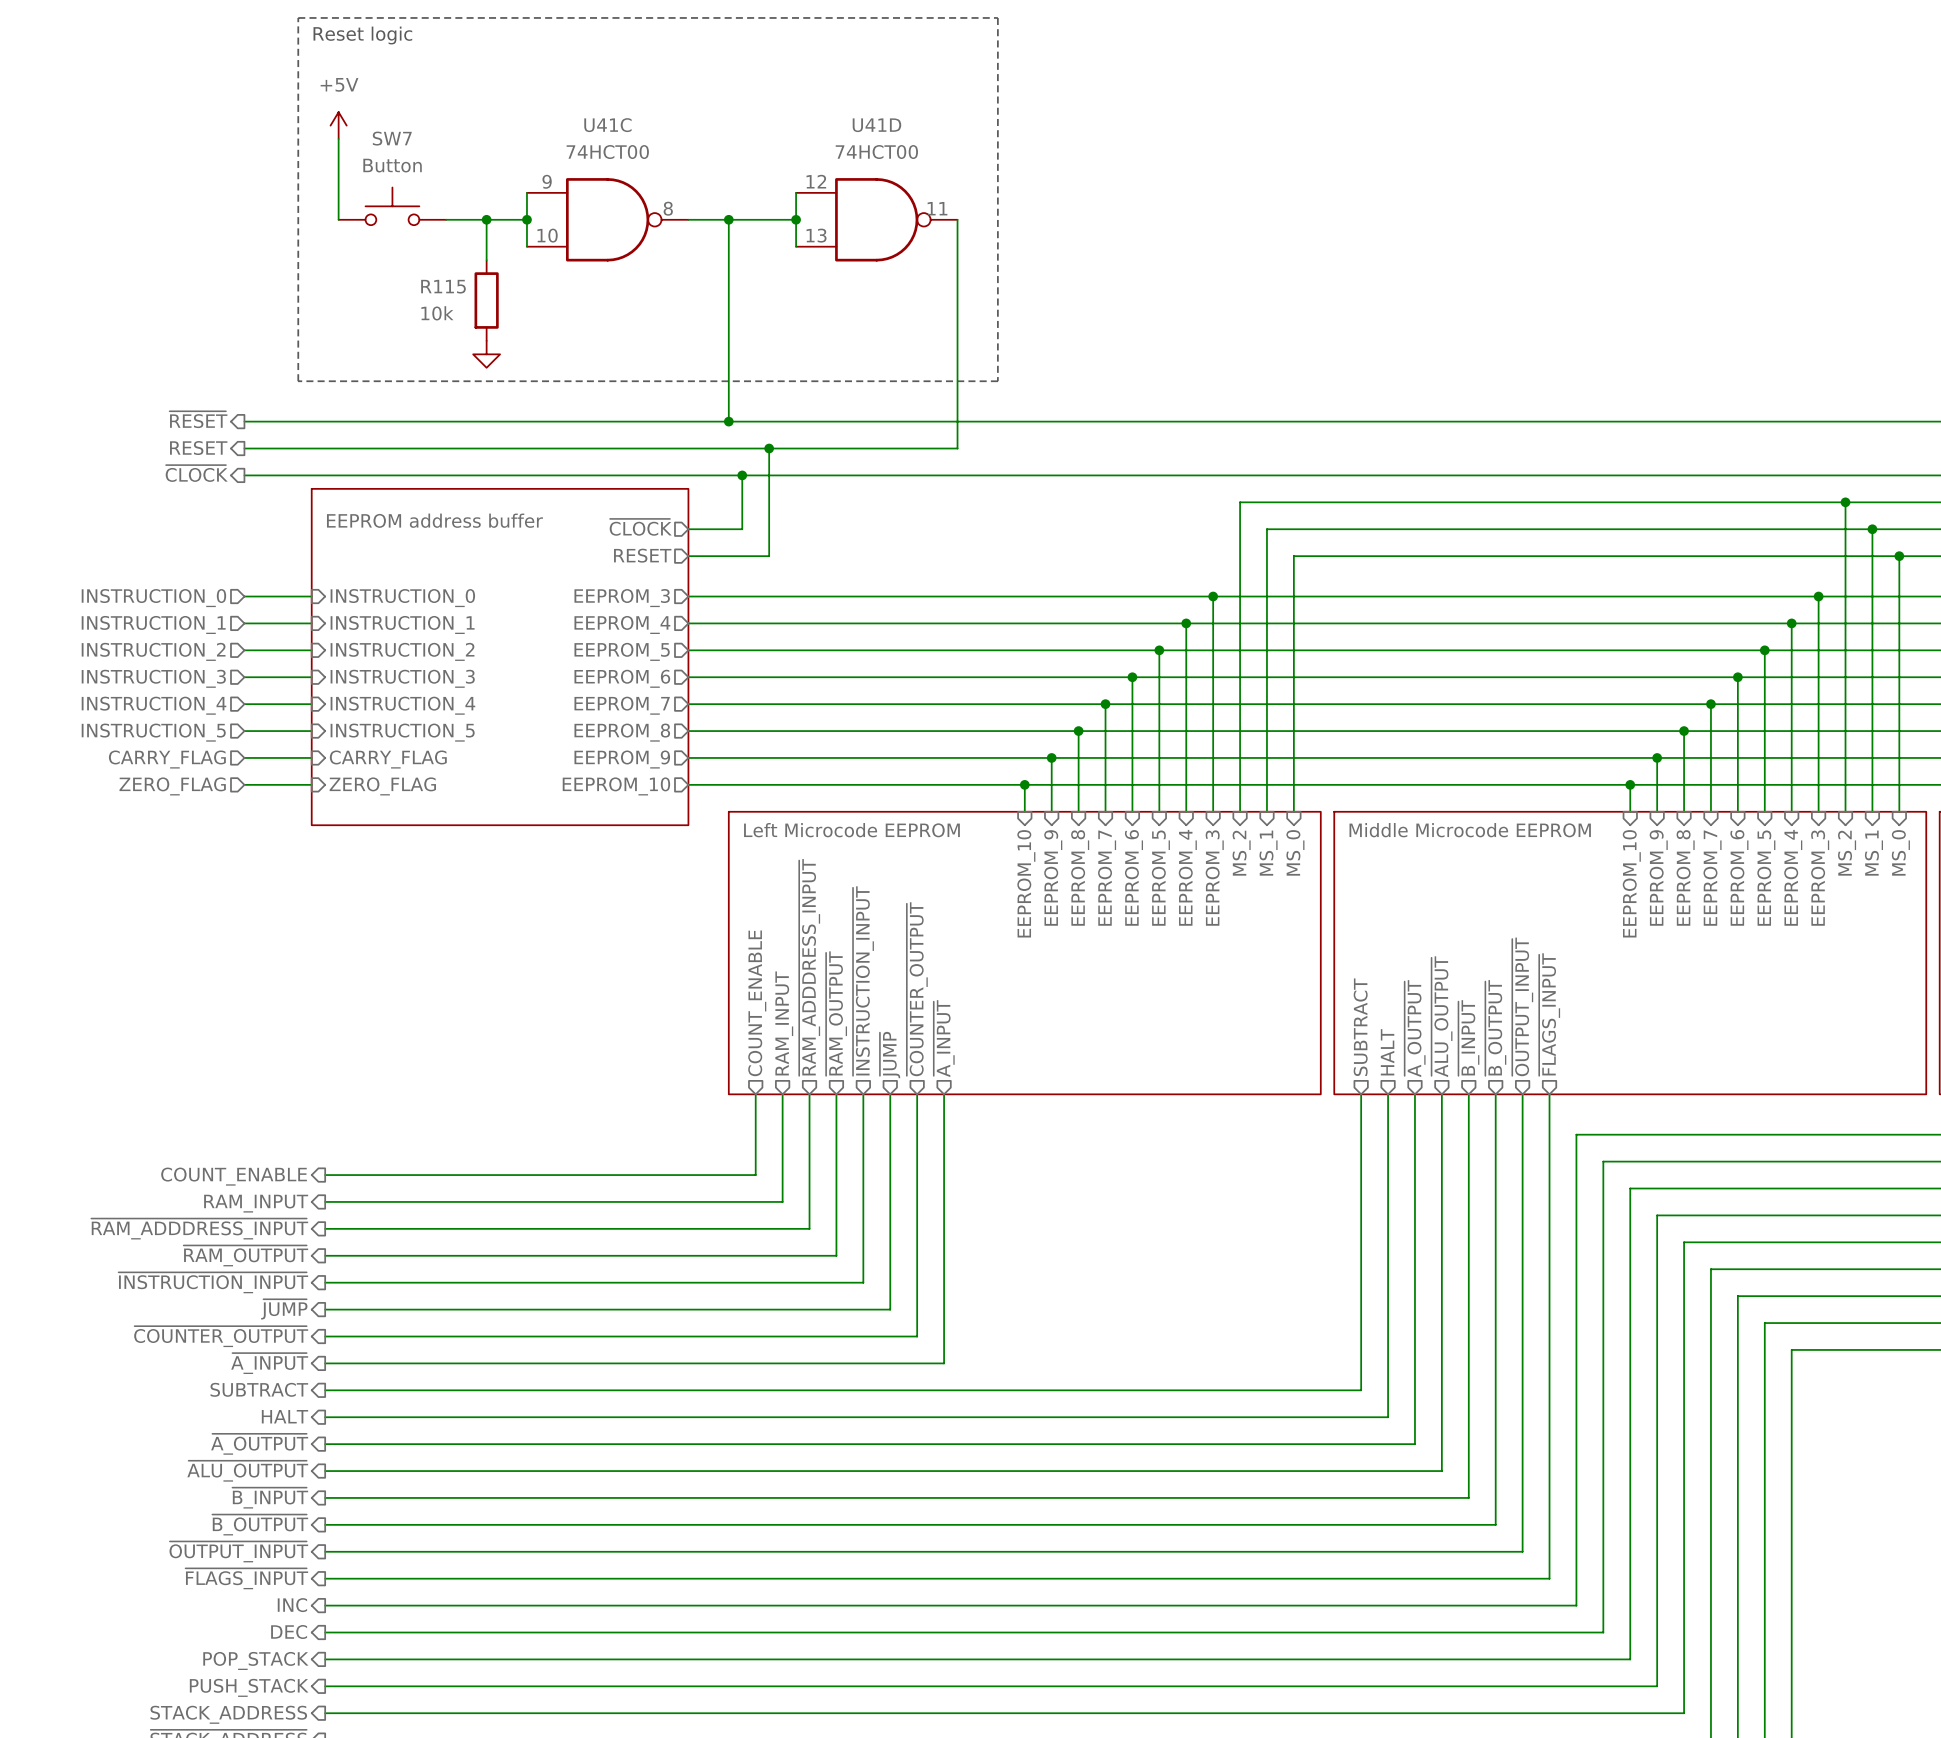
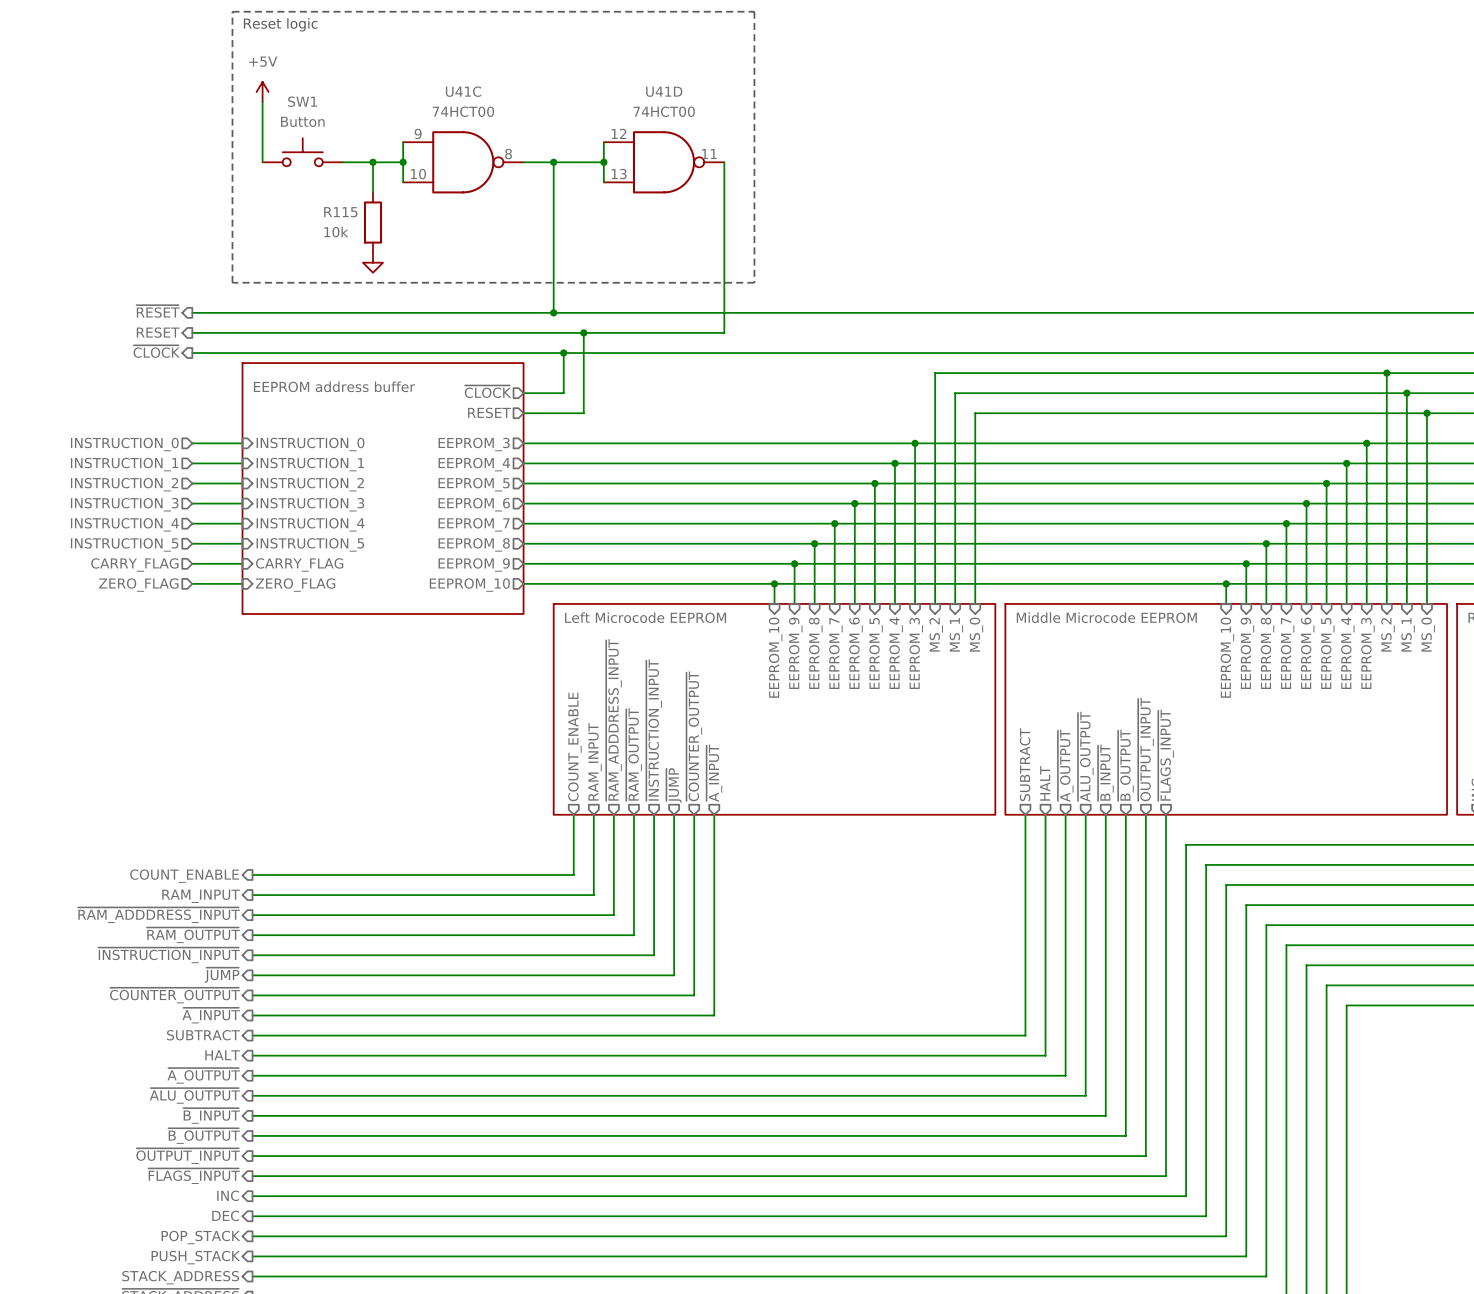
SW7 name: SW7 (392, 138) -> SW1 (302, 101)

